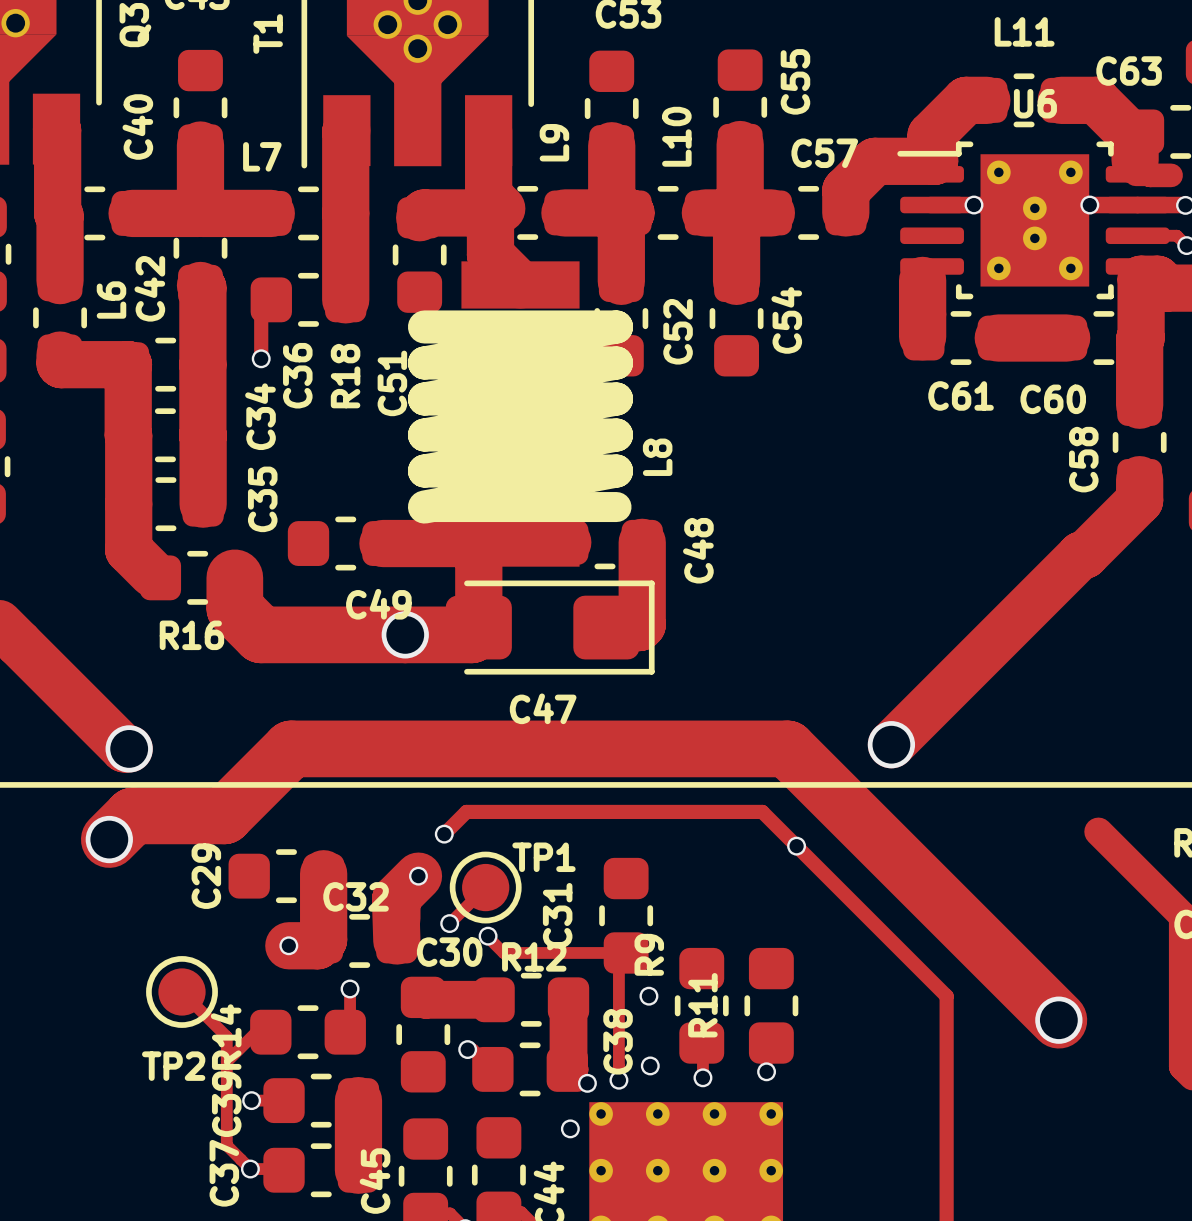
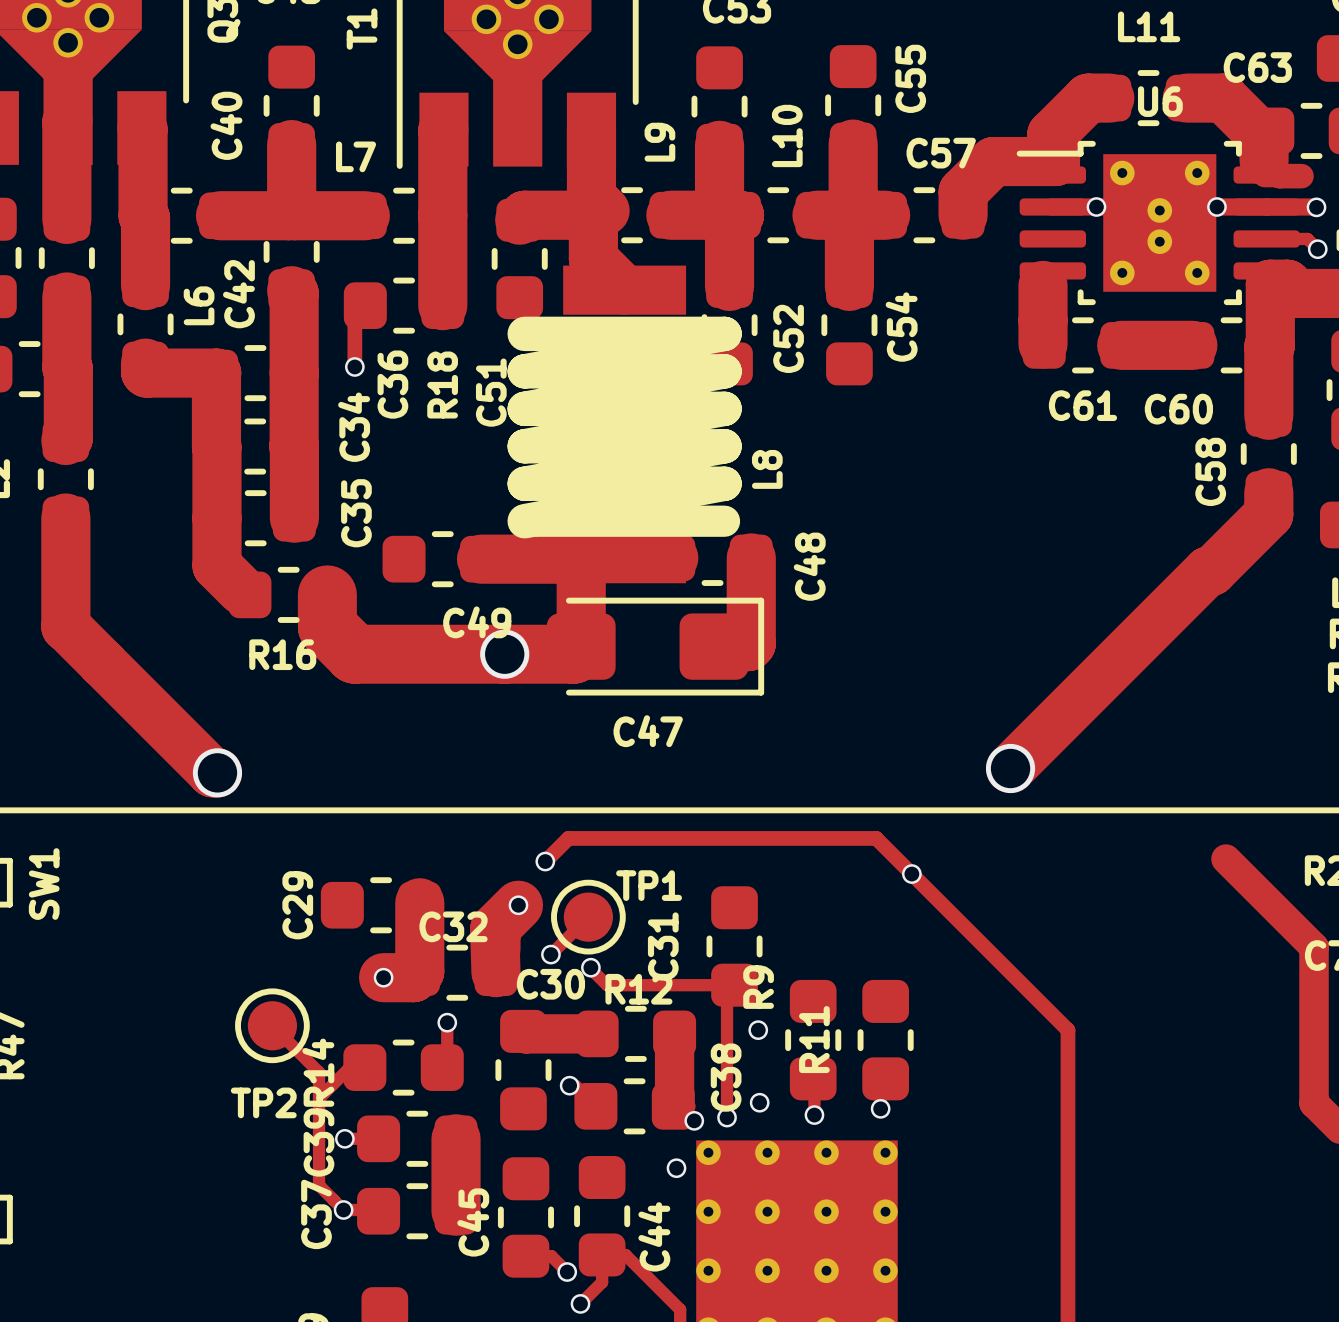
track: (109, 839) (132, 815) (224, 815) (291, 748) (787, 748) (1058, 1020) -> none
via: (109, 839) -> none
via: (1058, 1020) -> none

